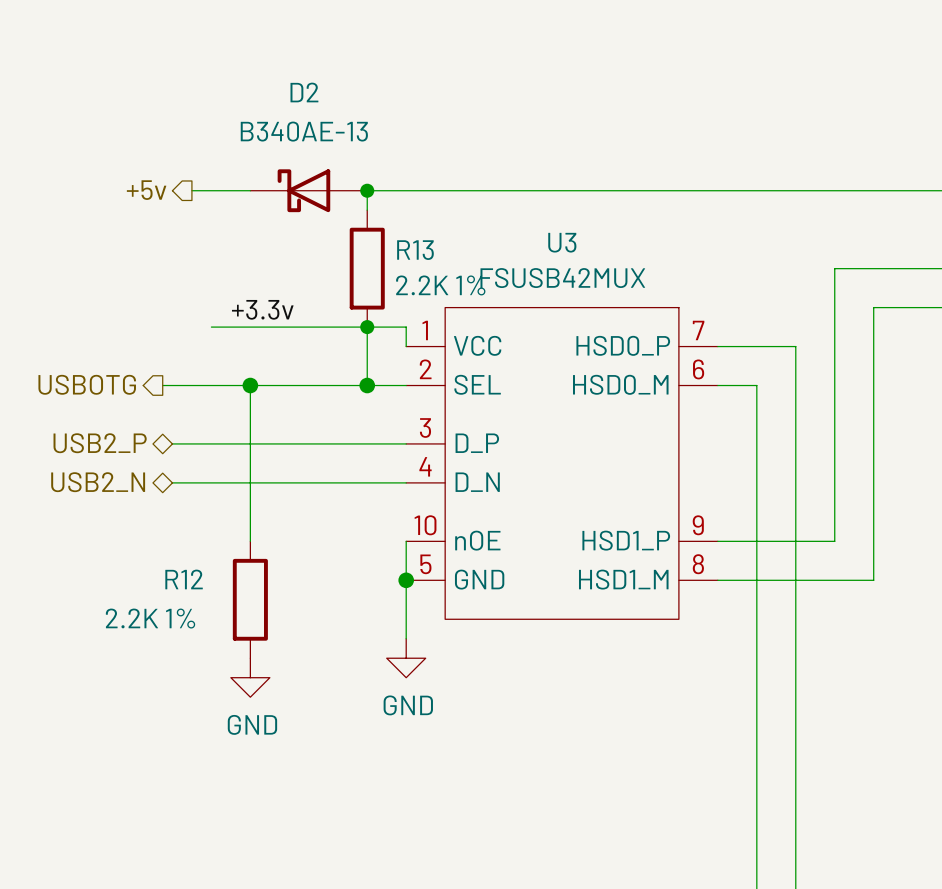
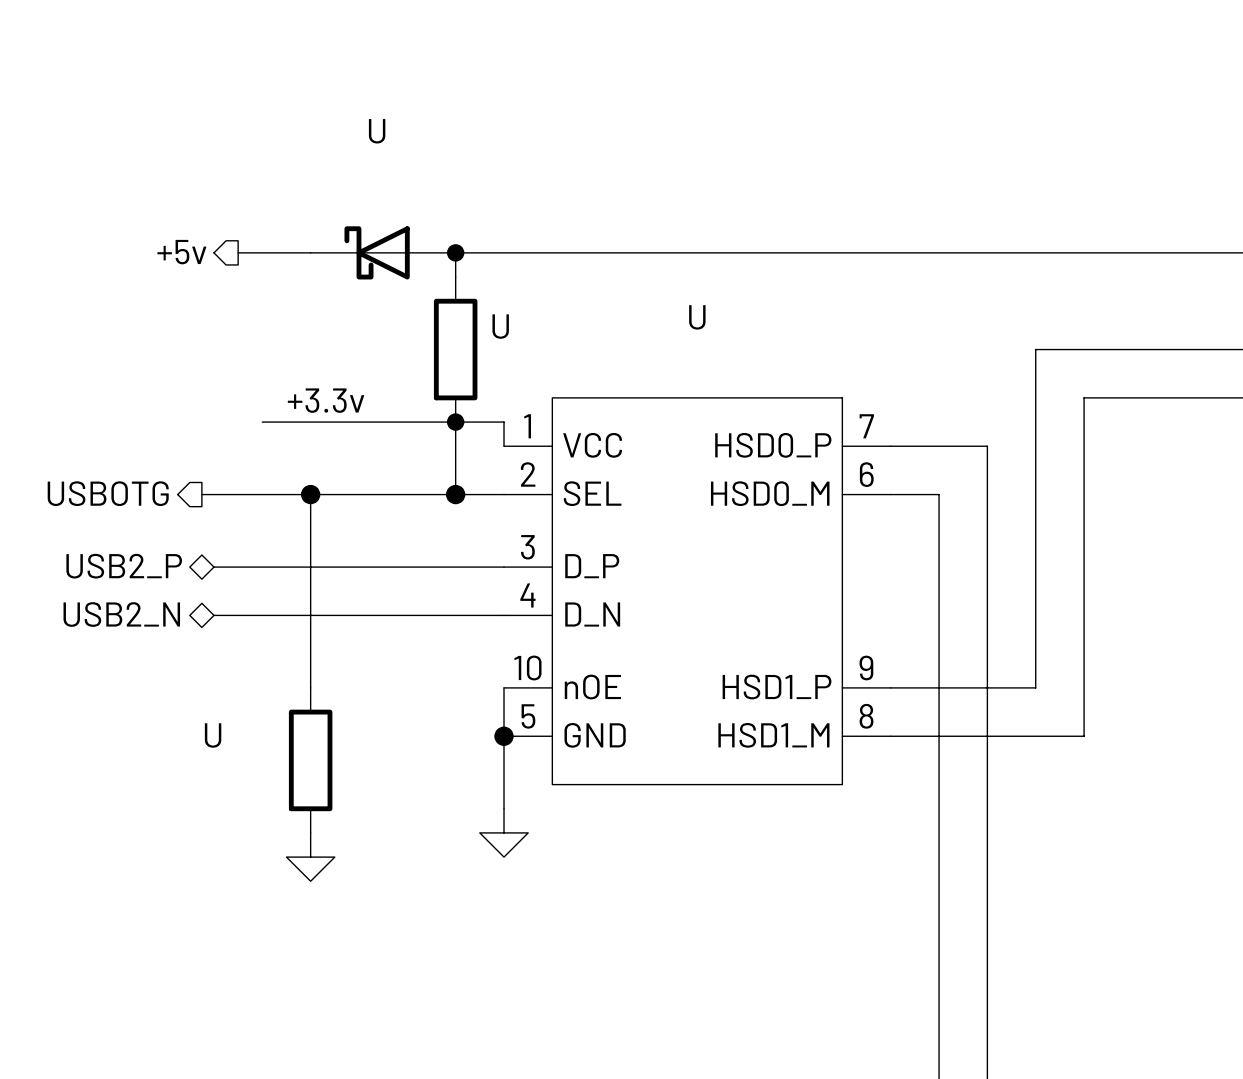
D2 name: D2 (304, 92) -> U (377, 131)
D2 value: B340AE-13 (304, 131) -> none
U3 name: U3 (562, 242) -> U (697, 317)
R13 name: R13 (415, 250) -> U (500, 326)
U3 value: FSUSB42MUX (562, 278) -> none
R13 value: 2.2K 1% (440, 285) -> none
R12 name: R12 (184, 579) -> U (213, 735)
R12 value: 2.2K 1% (150, 618) -> none
power symbol text: GND (408, 705) -> none
power symbol text: GND (252, 724) -> none

